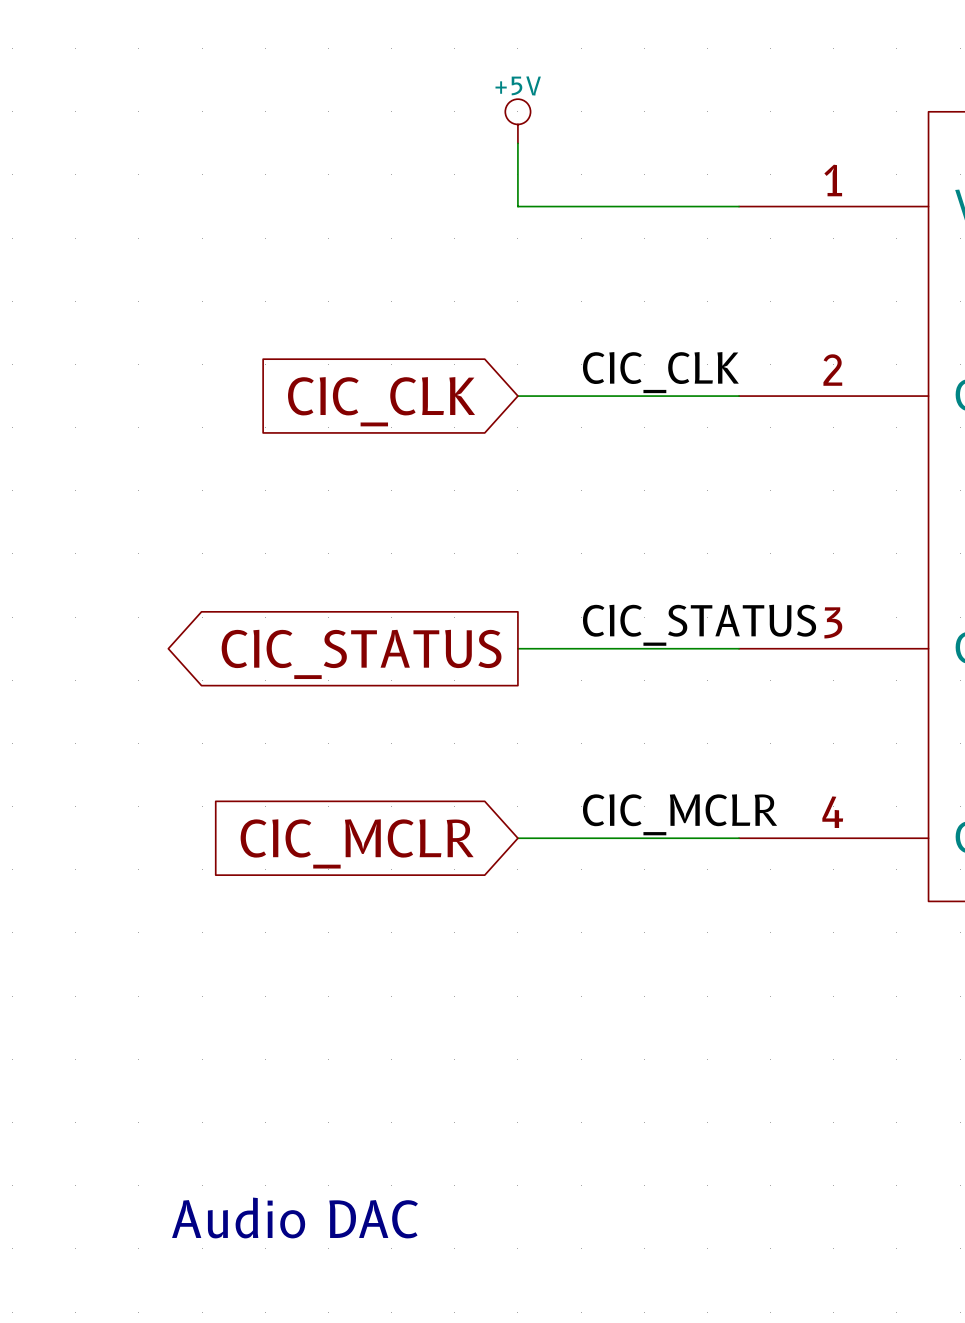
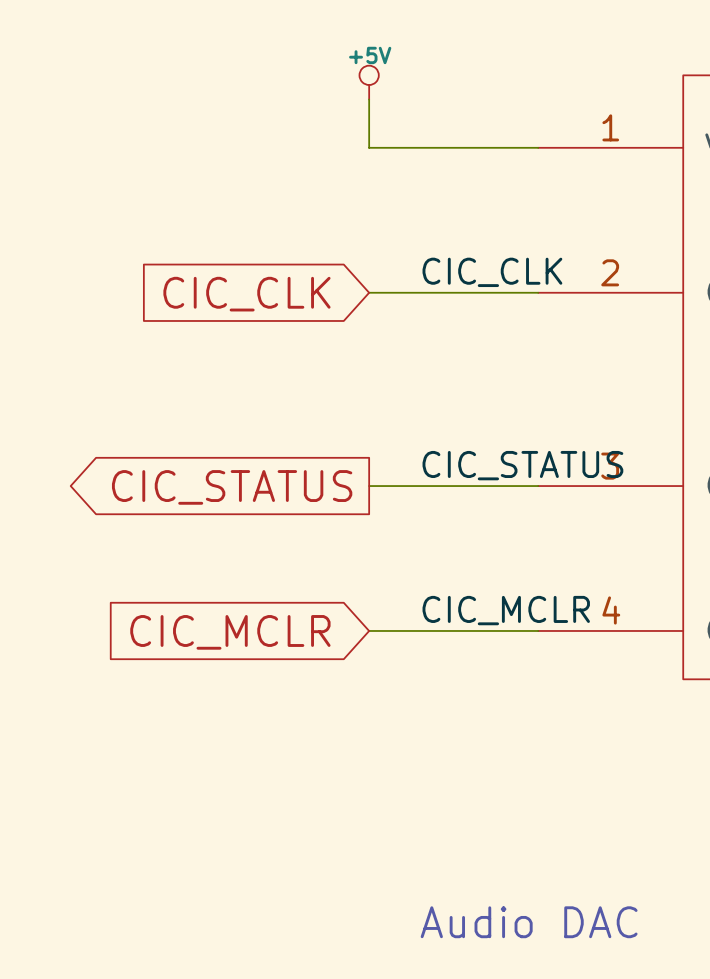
text position: Audio DAC (295, 1217) -> Audio DAC (529, 922)

